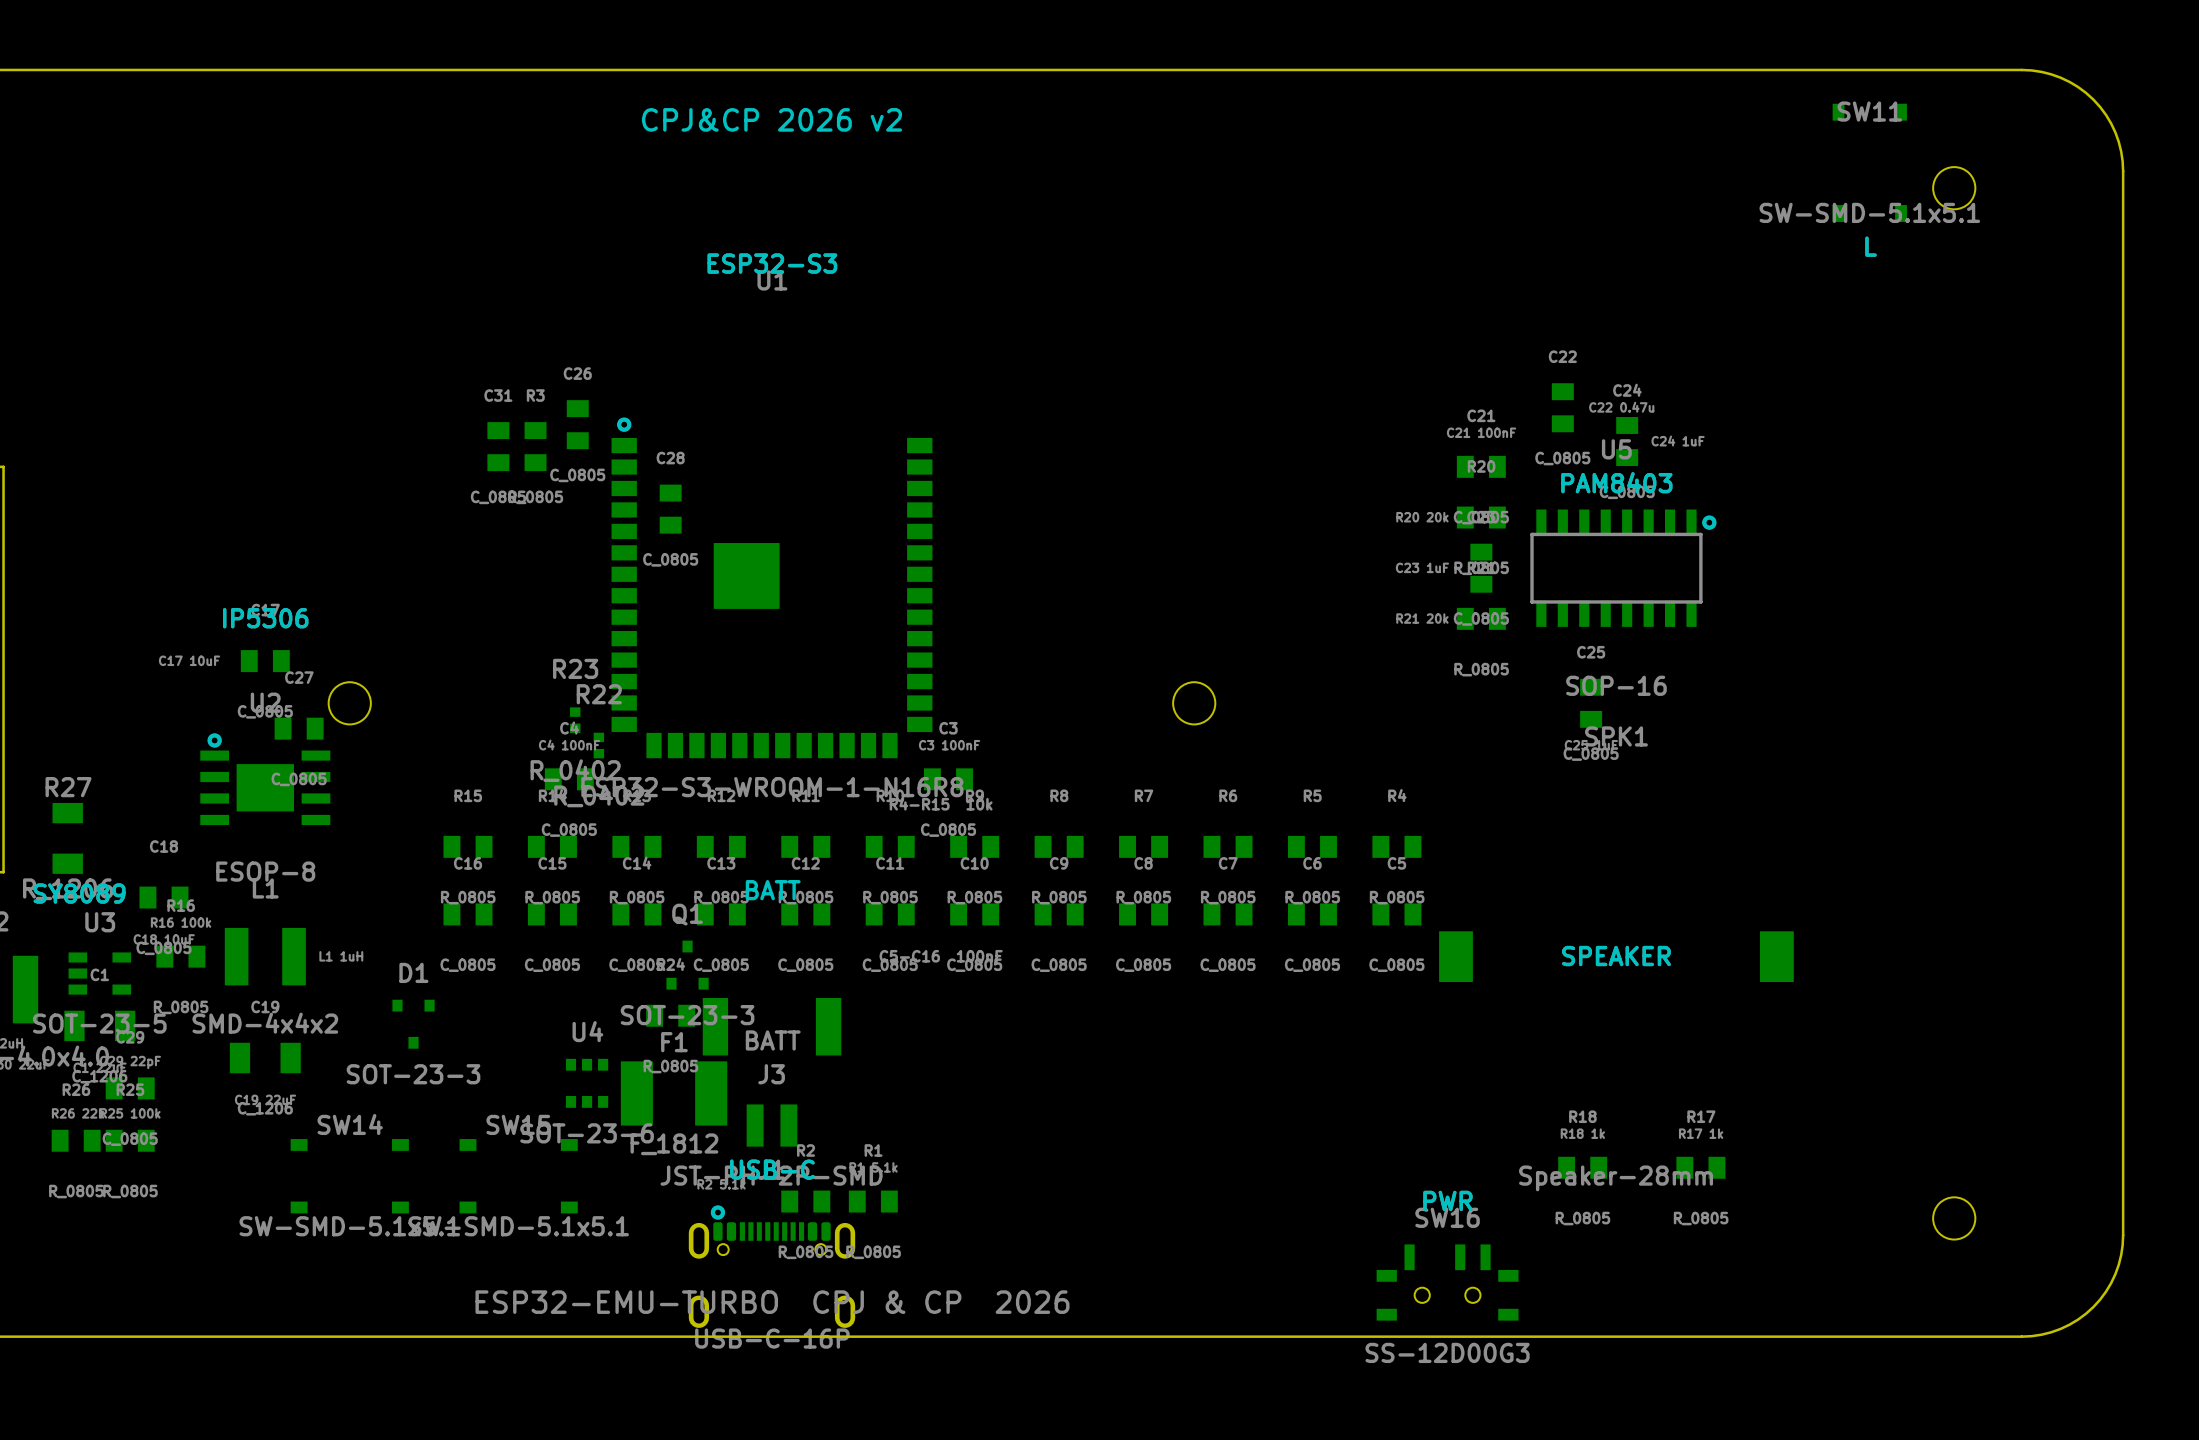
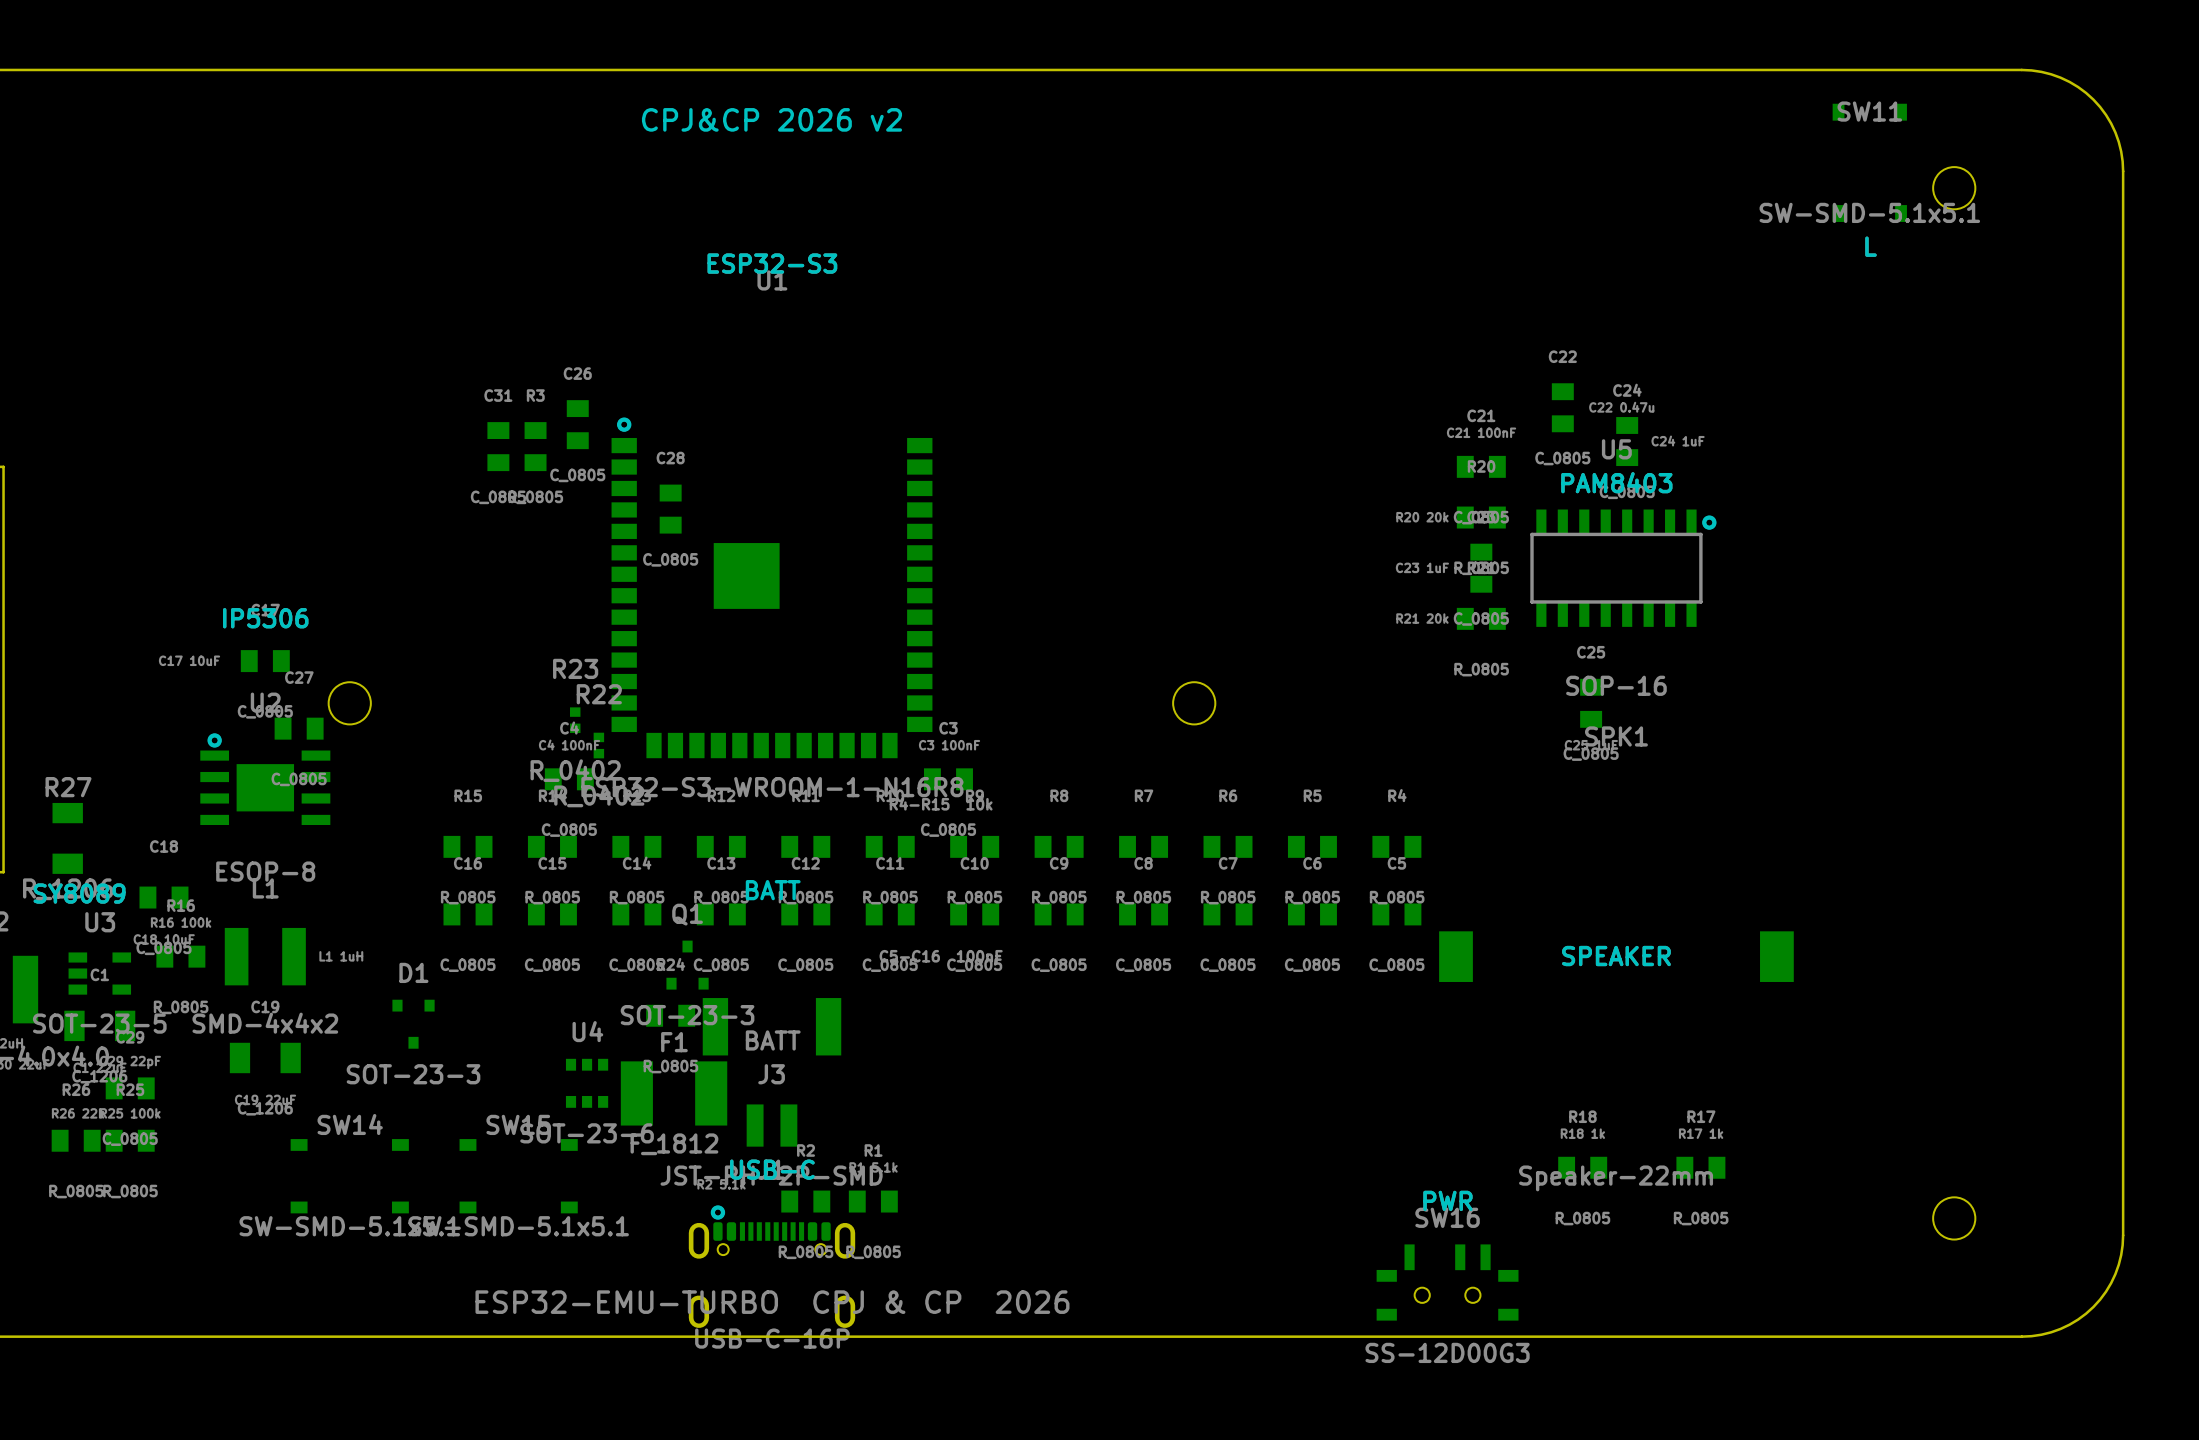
SPK1 value: Speaker-28mm (1616, 1178) -> Speaker-22mm (1616, 1178)

